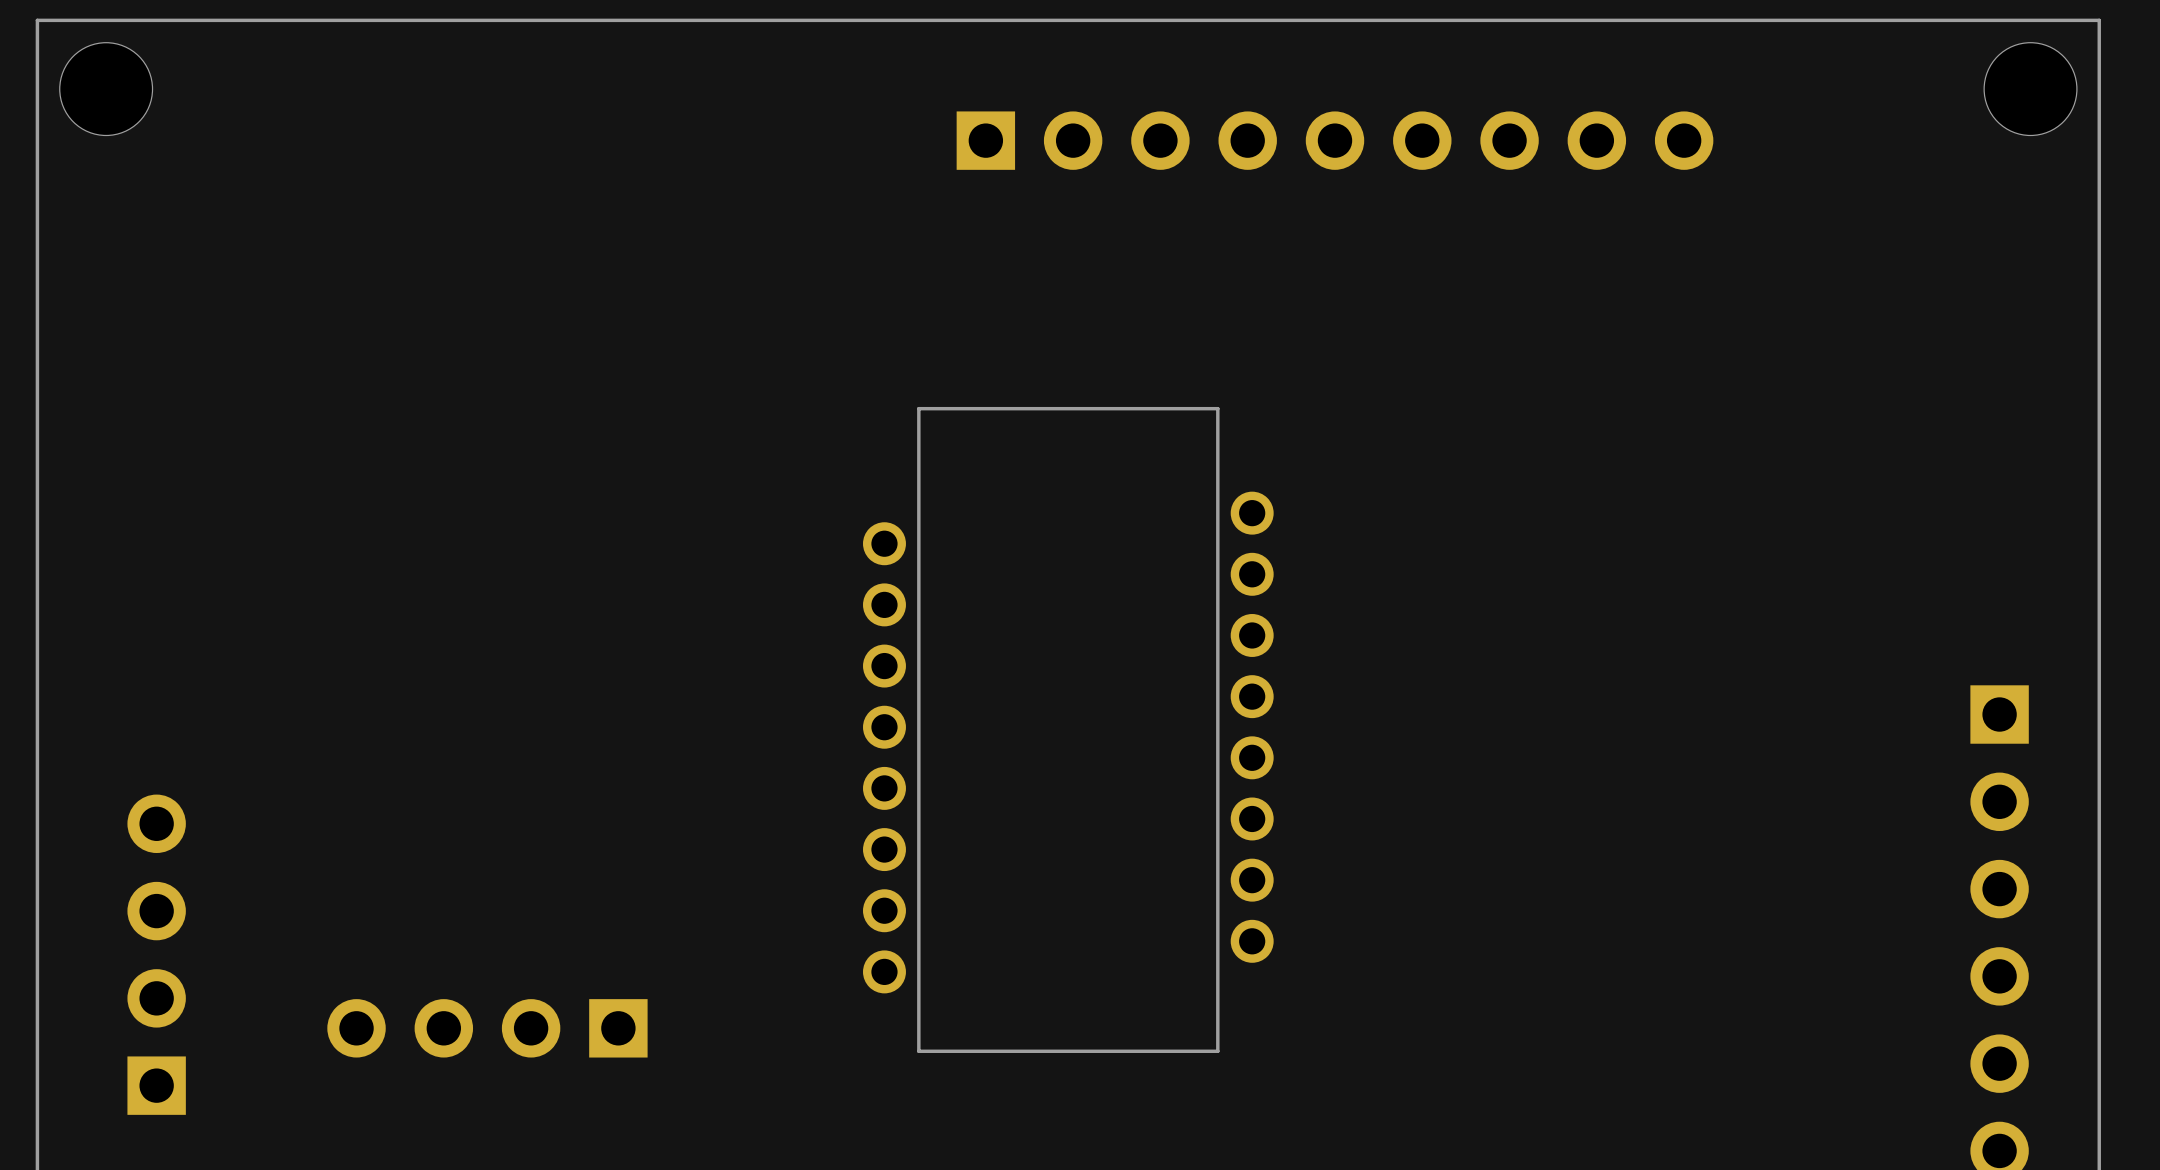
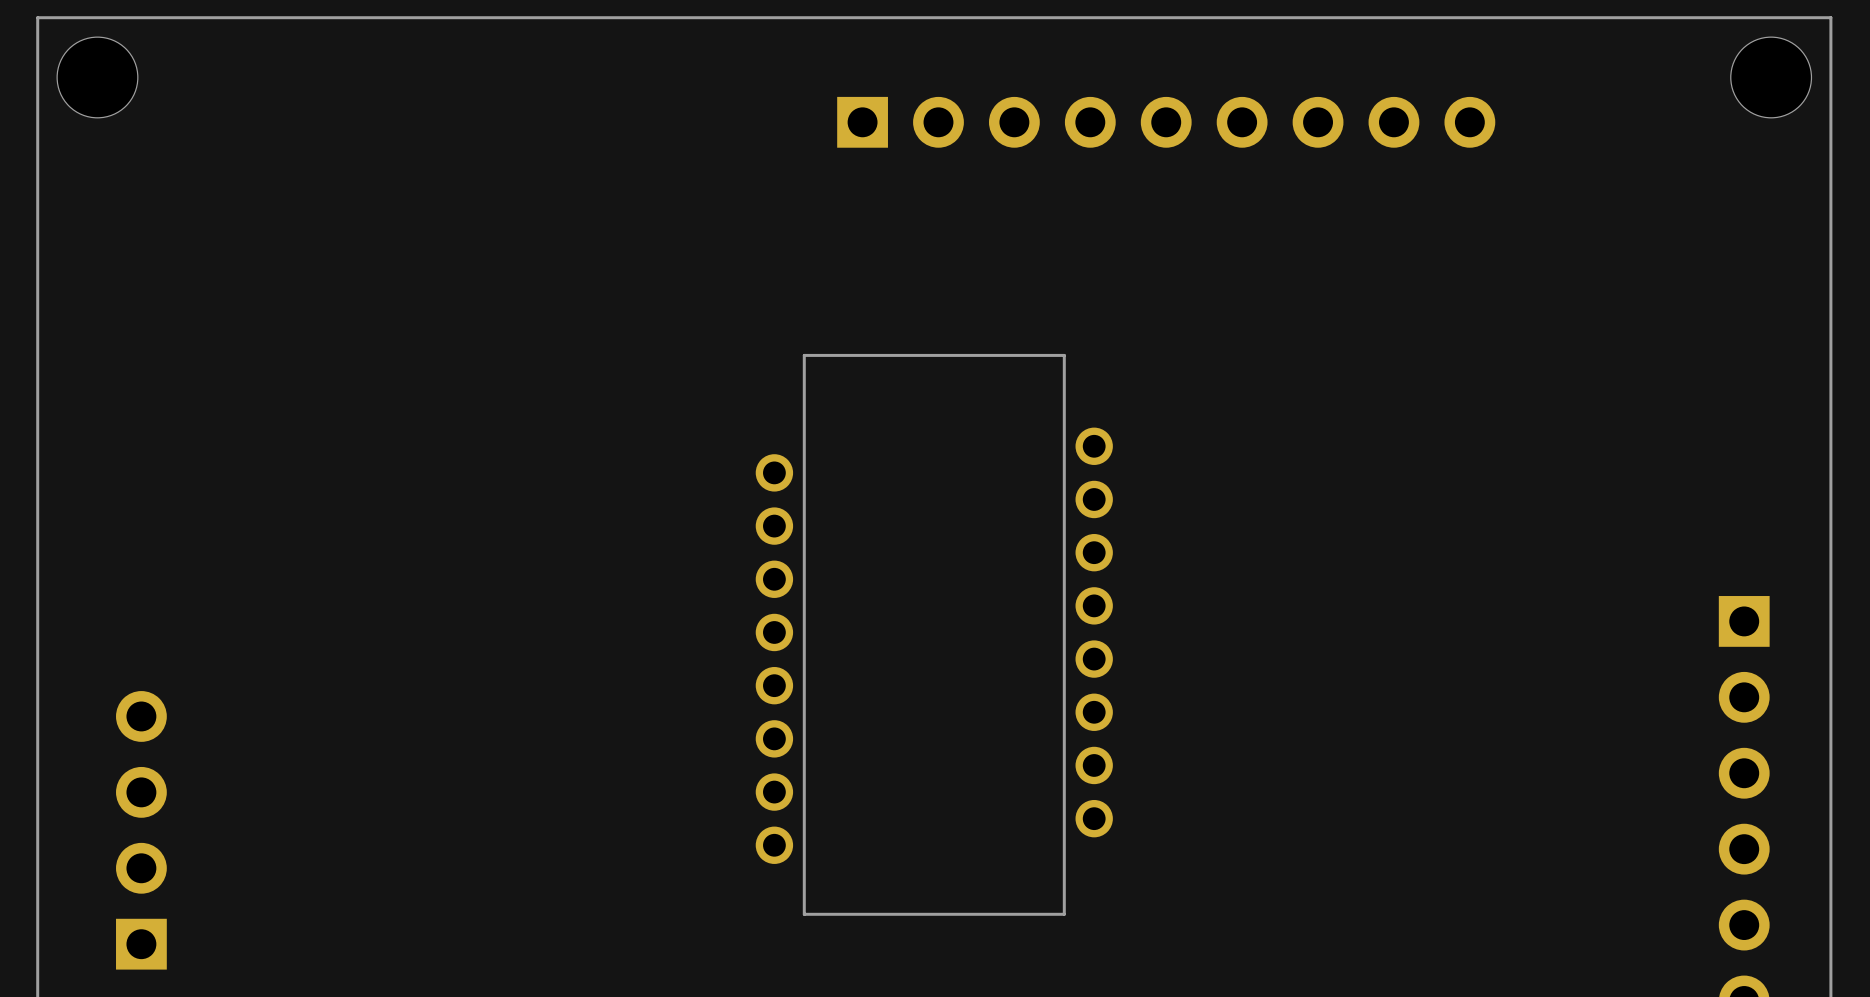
part: (487, 1028) -> none

